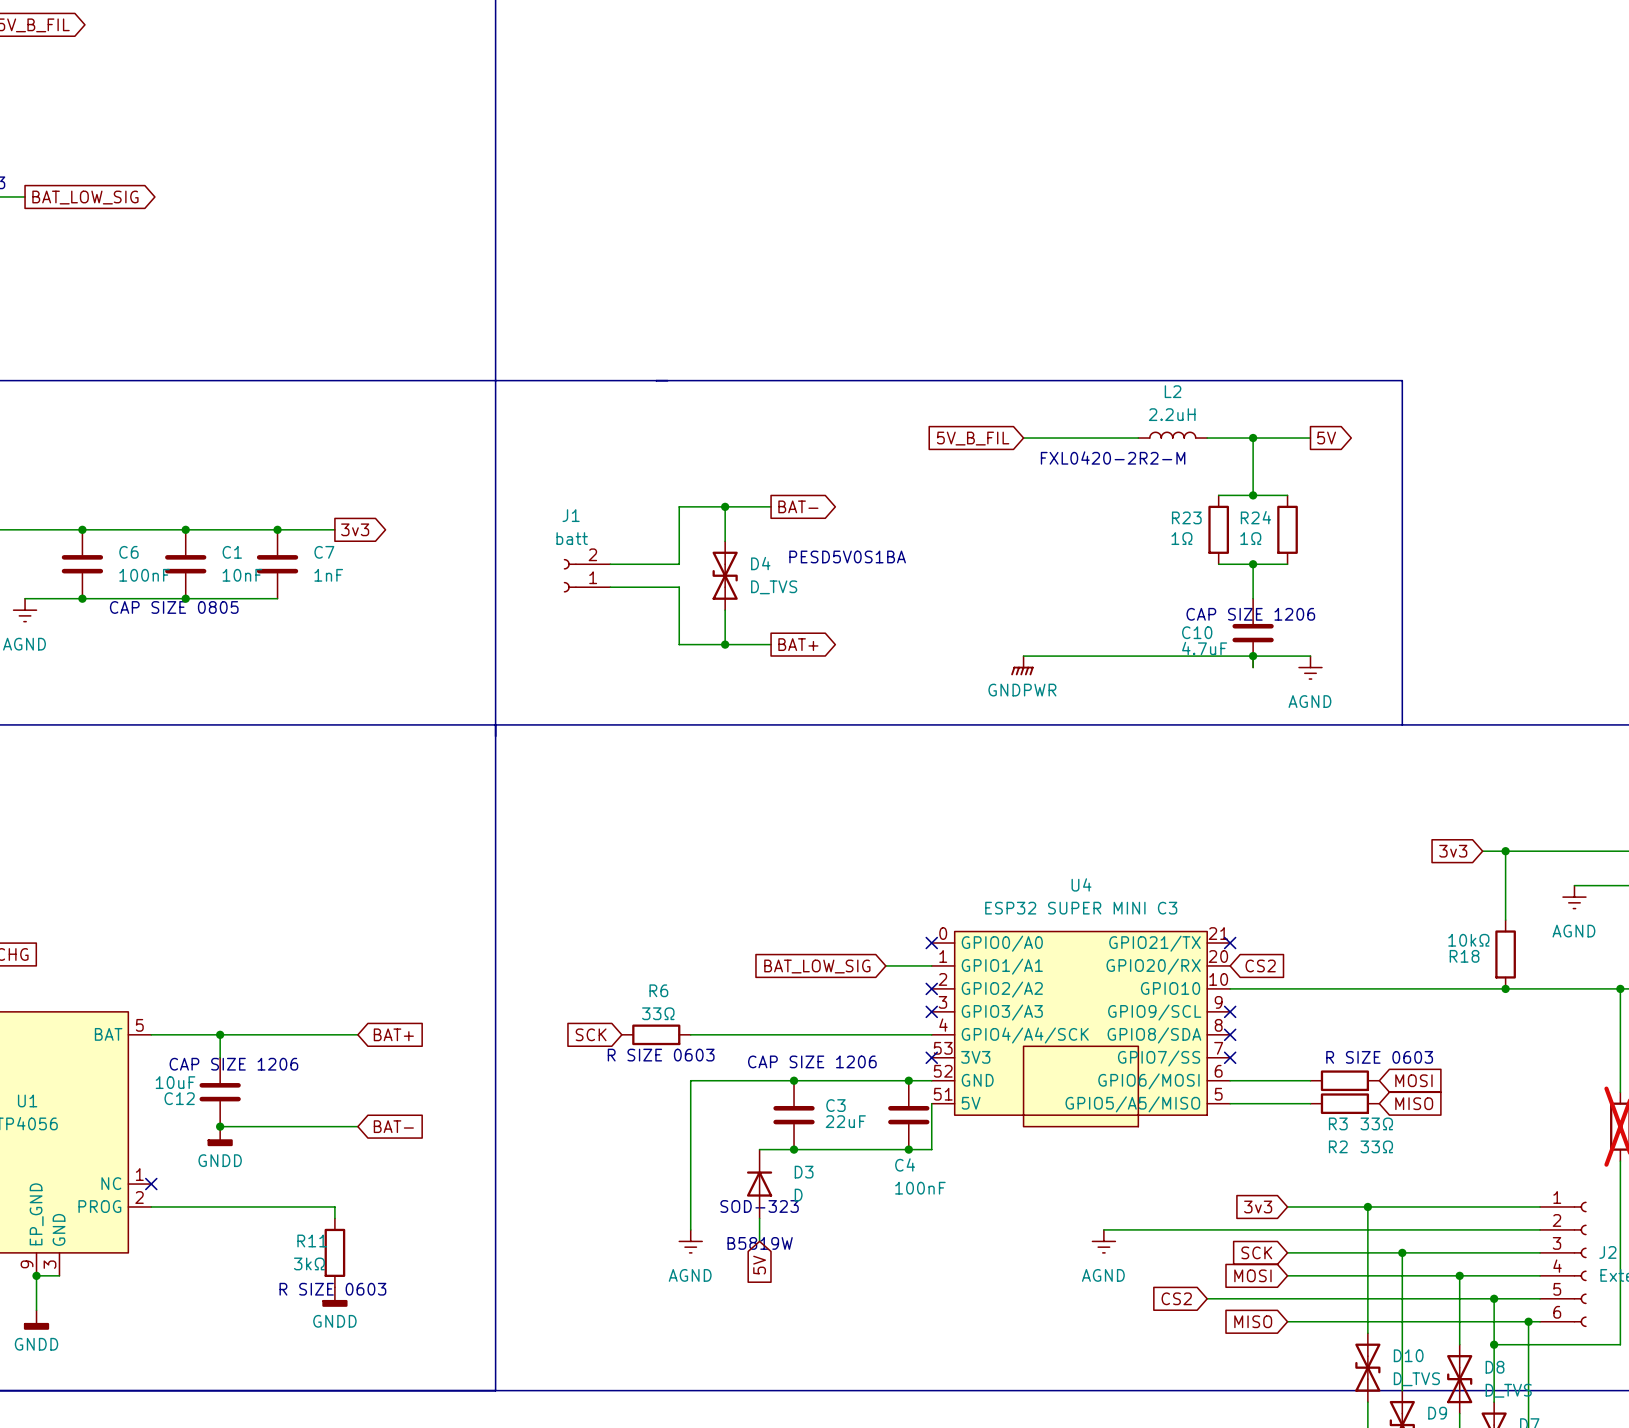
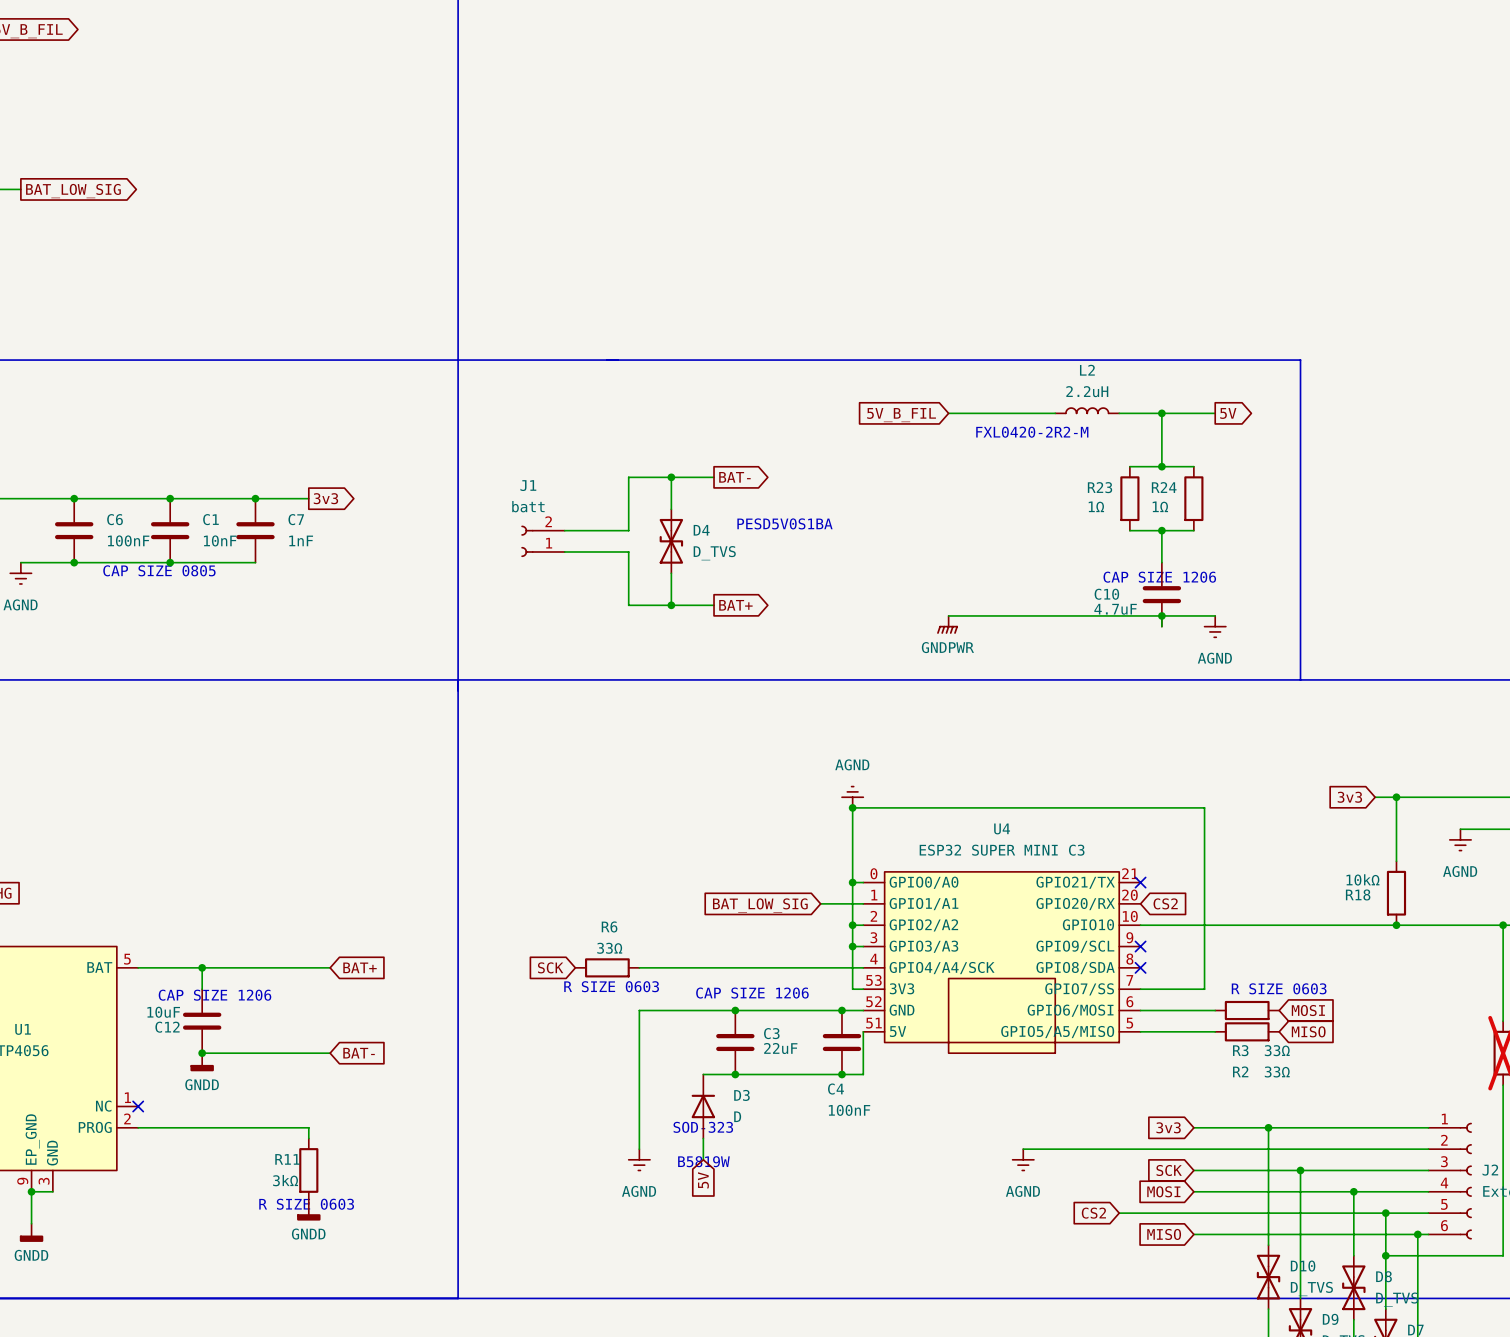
power symbol: none -> AGND (852, 797)
junction: none -> (852, 807)
wire: none -> (852, 882) (863, 882)
junction: none -> (852, 882)
no-connect mark: (931, 943) -> none
wire: none -> (852, 925) (863, 925)
junction: none -> (852, 925)
no-connect mark: (931, 988) -> none
wire: none -> (852, 946) (863, 946)
junction: none -> (852, 946)
no-connect mark: (931, 1011) -> none
wire: none -> (863, 989) (852, 989) (852, 807) (1204, 807) (1204, 989) (1140, 989)
no-connect mark: (931, 1057) -> none
no-connect mark: (1230, 1057) -> none

